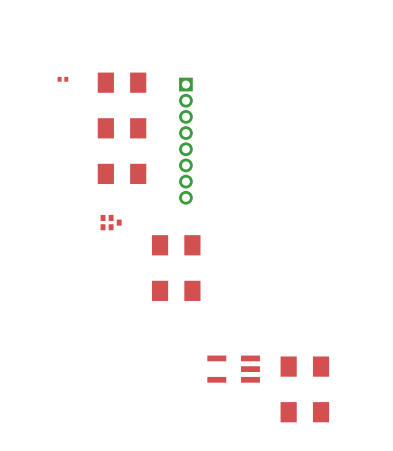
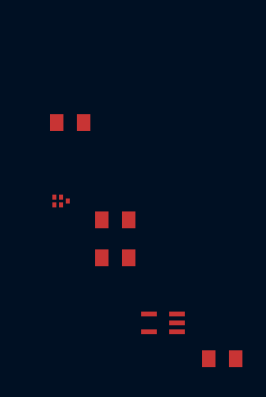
part: (62, 79) -> none
part: (122, 82) -> none
part: (185, 141) -> none
part: (122, 173) -> none
part: (304, 366) -> none

